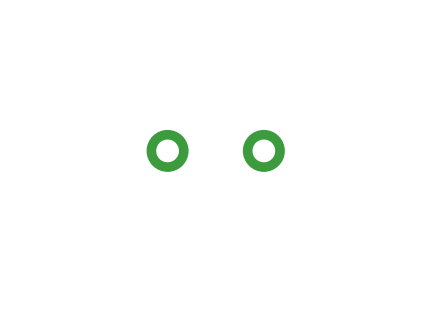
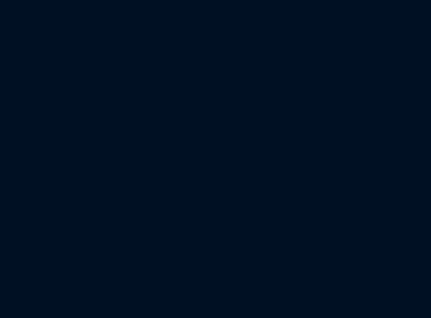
part: (215, 150) -> none

